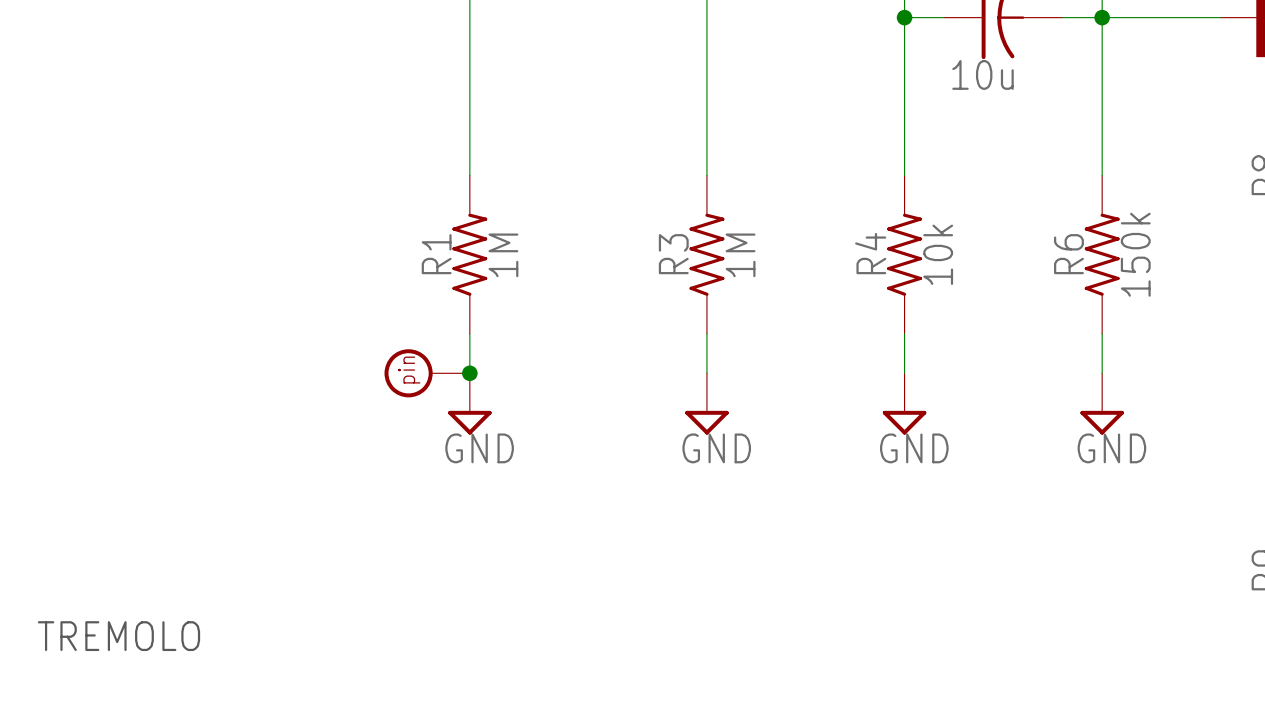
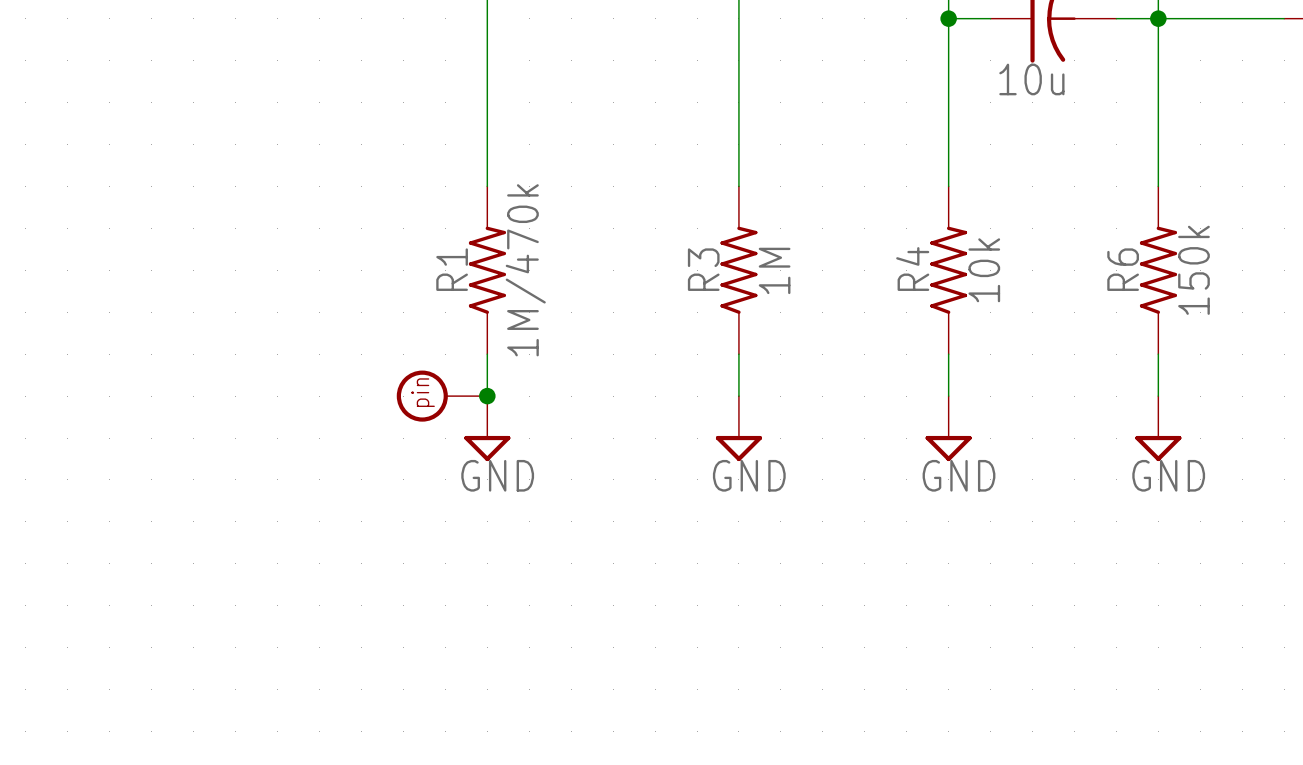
R1 value: 1M (503, 255) -> 1M/470k (525, 270)
text: TREMOLO (118, 636) -> none

